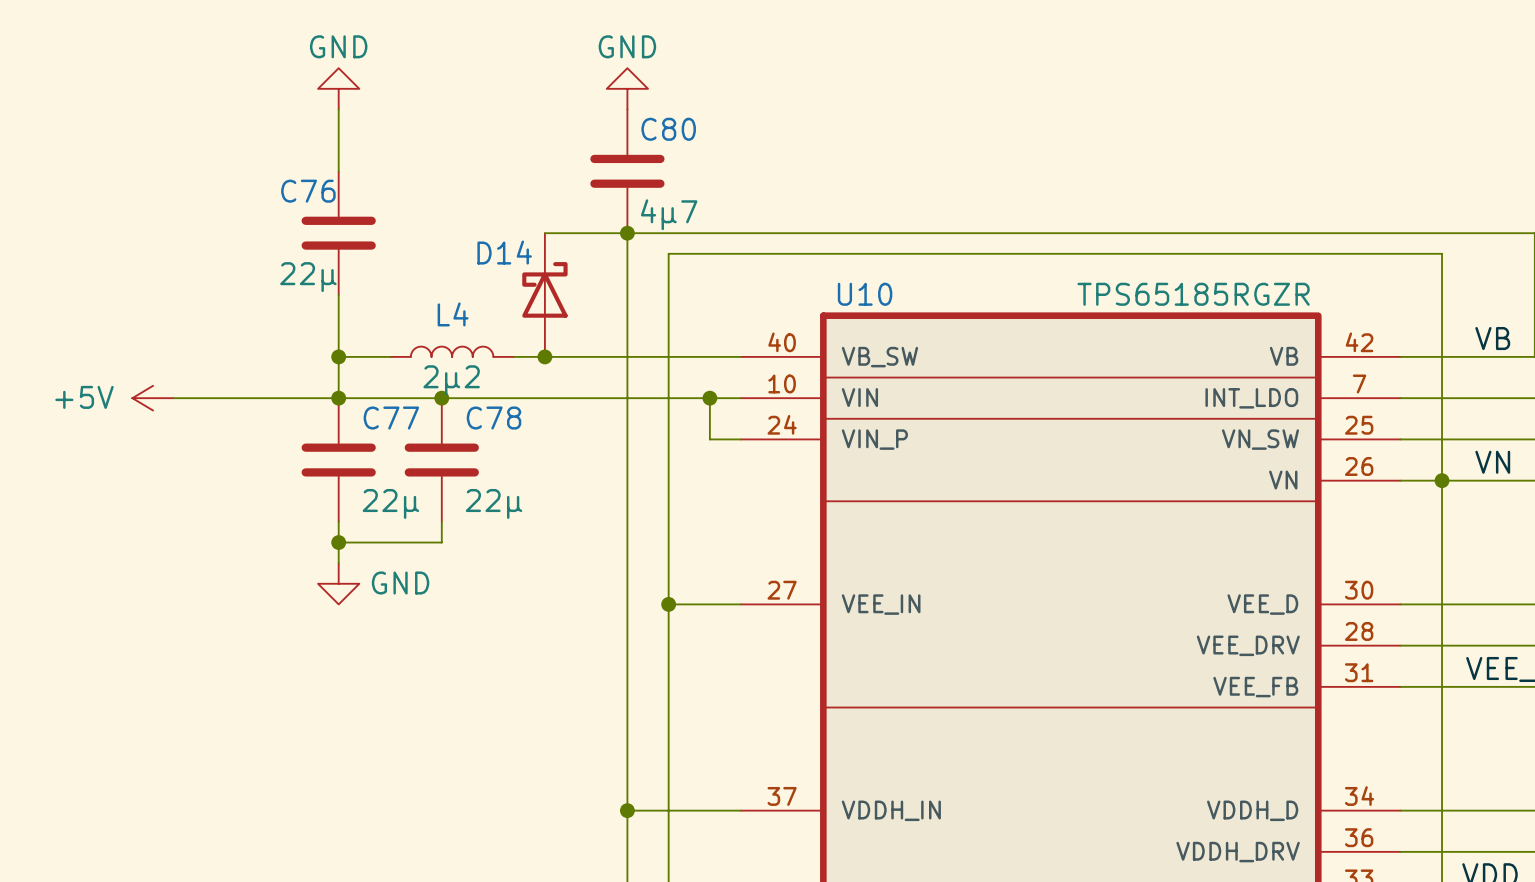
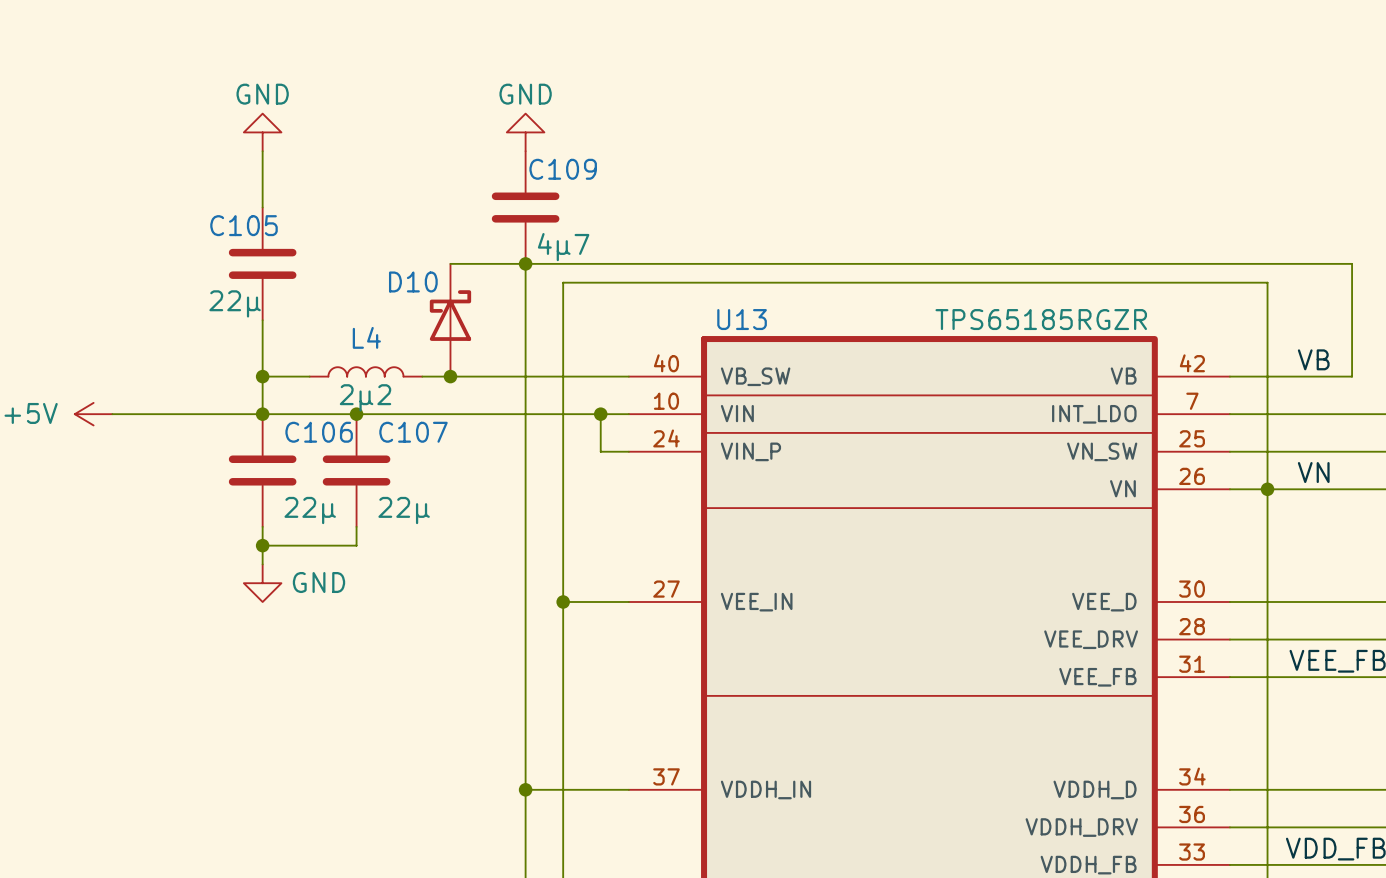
C80 name: C80 (668, 129) -> C109 (563, 169)
C76 name: C76 (308, 191) -> C105 (244, 225)
D14 name: D14 (504, 252) -> D10 (413, 281)
U10 name: U10 (865, 294) -> U13 (742, 319)
C77 name: C77 (391, 418) -> C106 (319, 432)
C78 name: C78 (494, 418) -> C107 (413, 432)

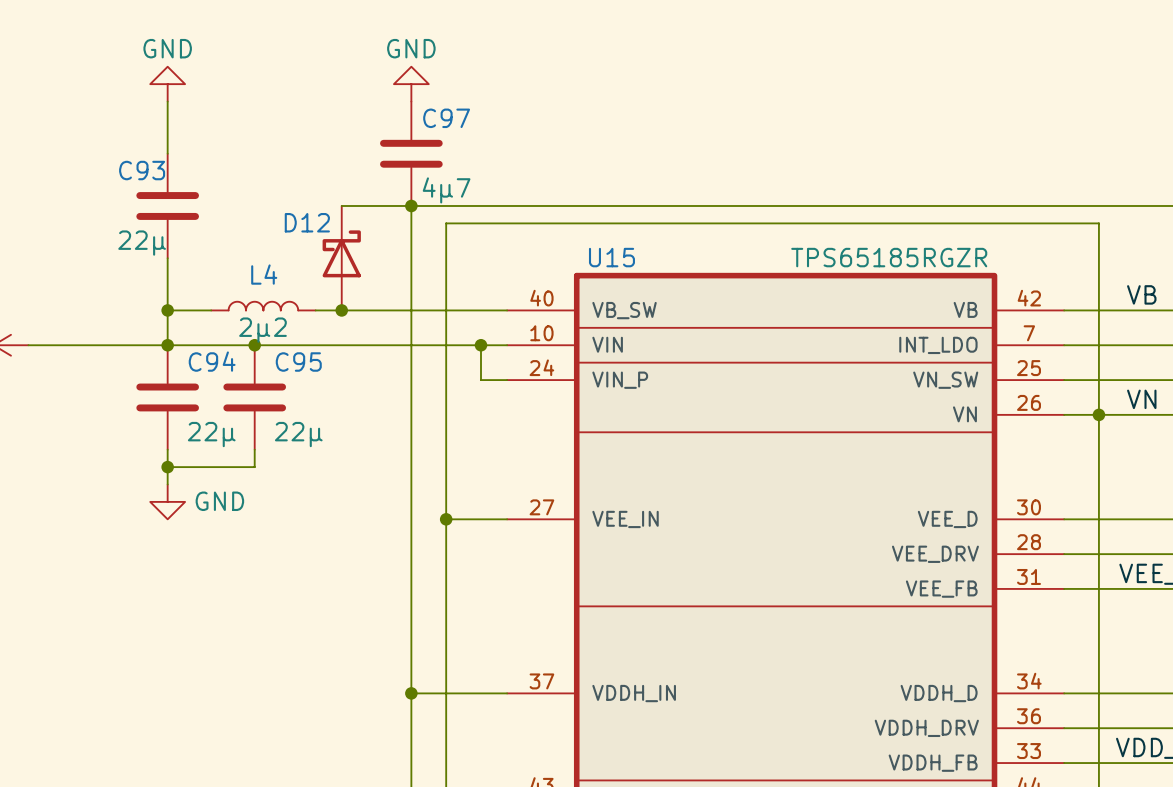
C109 name: C109 (563, 169) -> C97 (446, 118)
C105 name: C105 (244, 225) -> C93 (142, 170)
D10 name: D10 (413, 281) -> D12 (307, 222)
U13 name: U13 (742, 319) -> U15 (611, 257)
C106 name: C106 (319, 432) -> C94 (212, 361)
C107 name: C107 (413, 432) -> C95 (298, 362)

